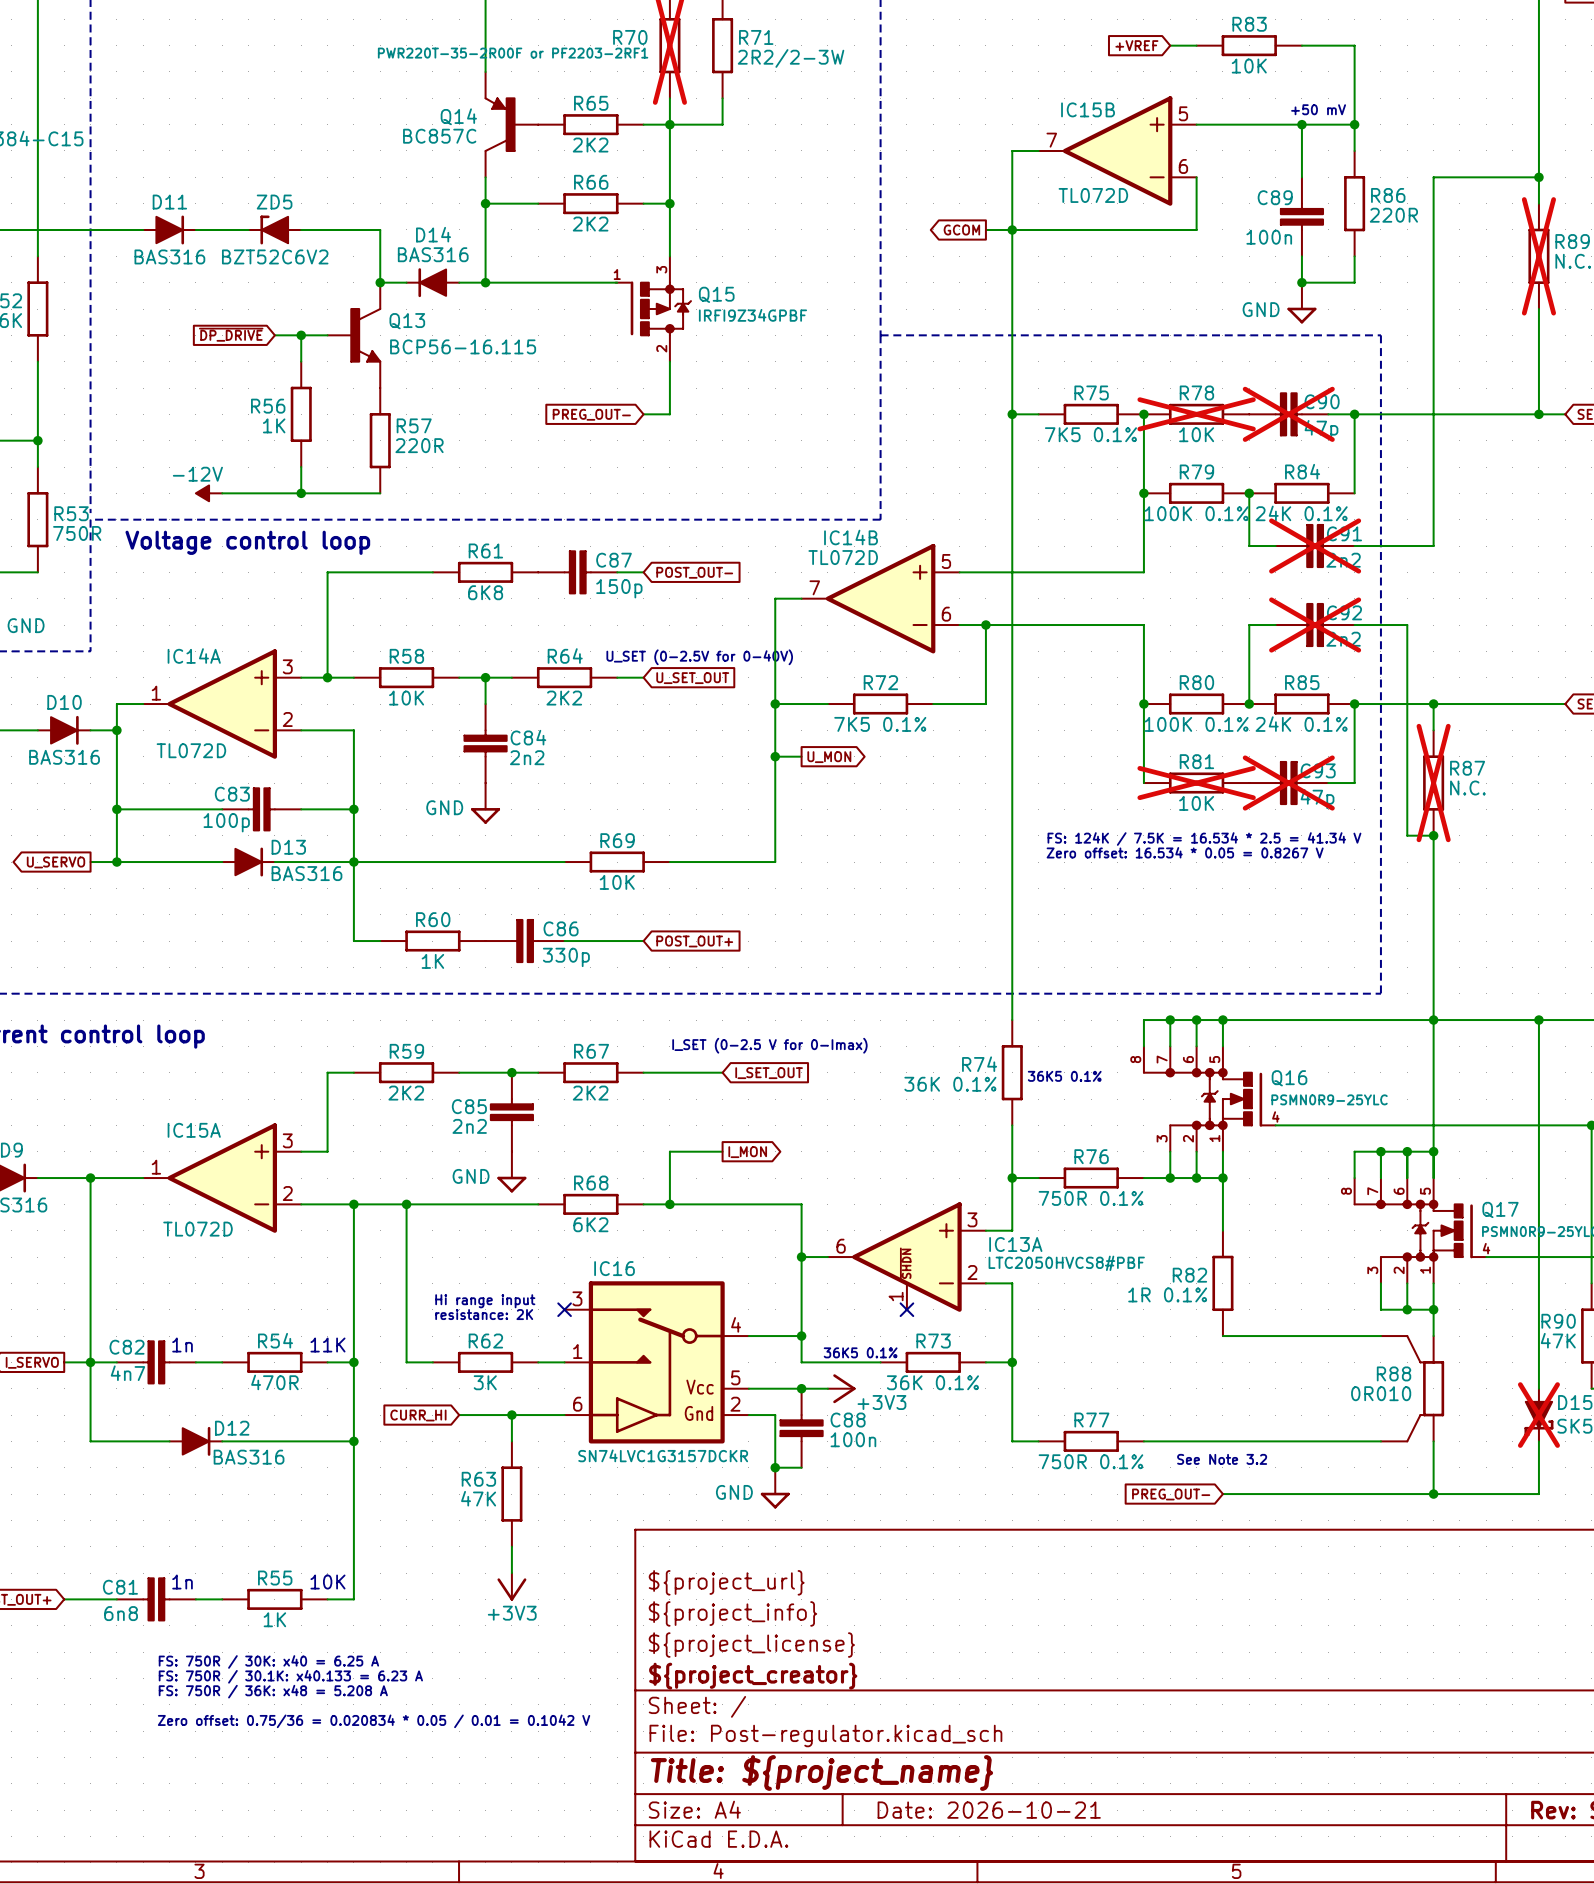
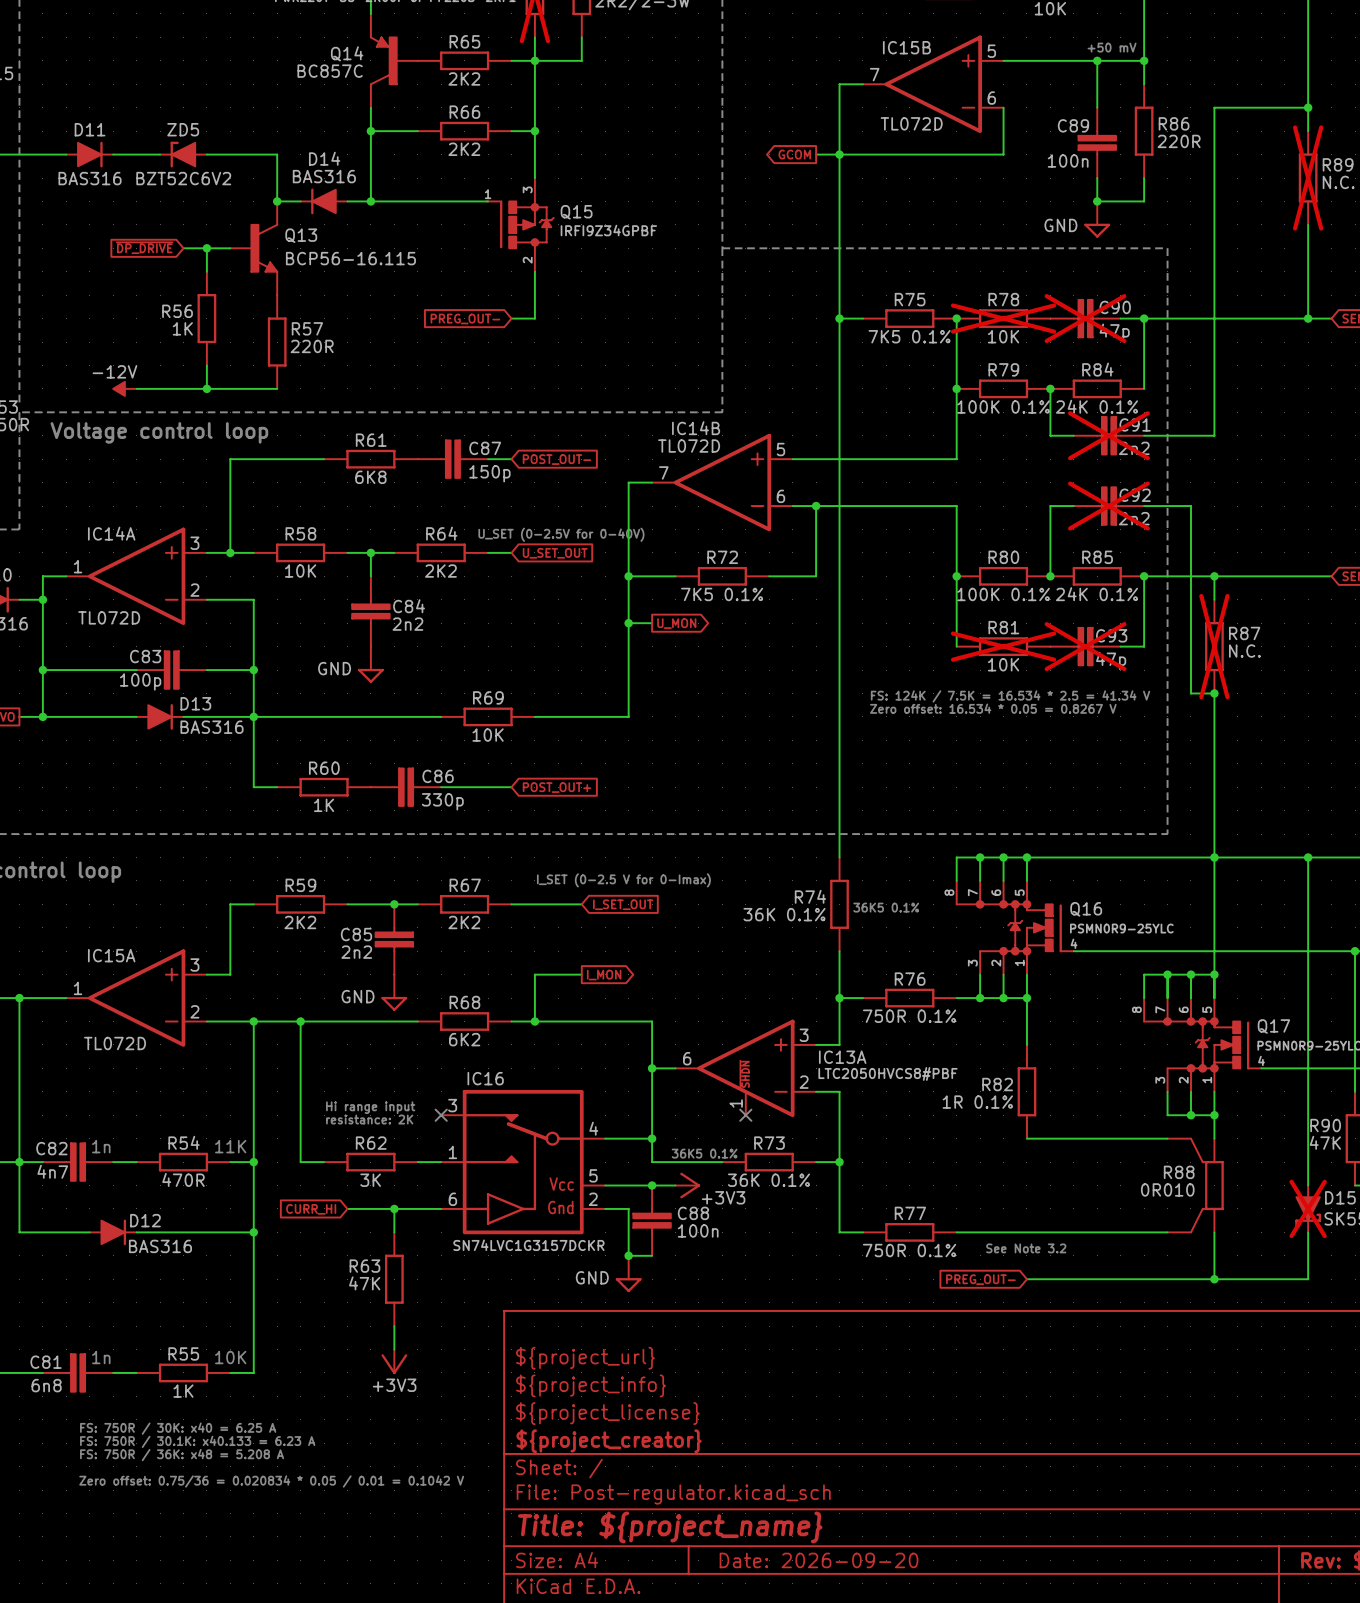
title block: Date: 2026-10-21 (989, 1810) -> Date: 2026-09-20 (819, 1560)

